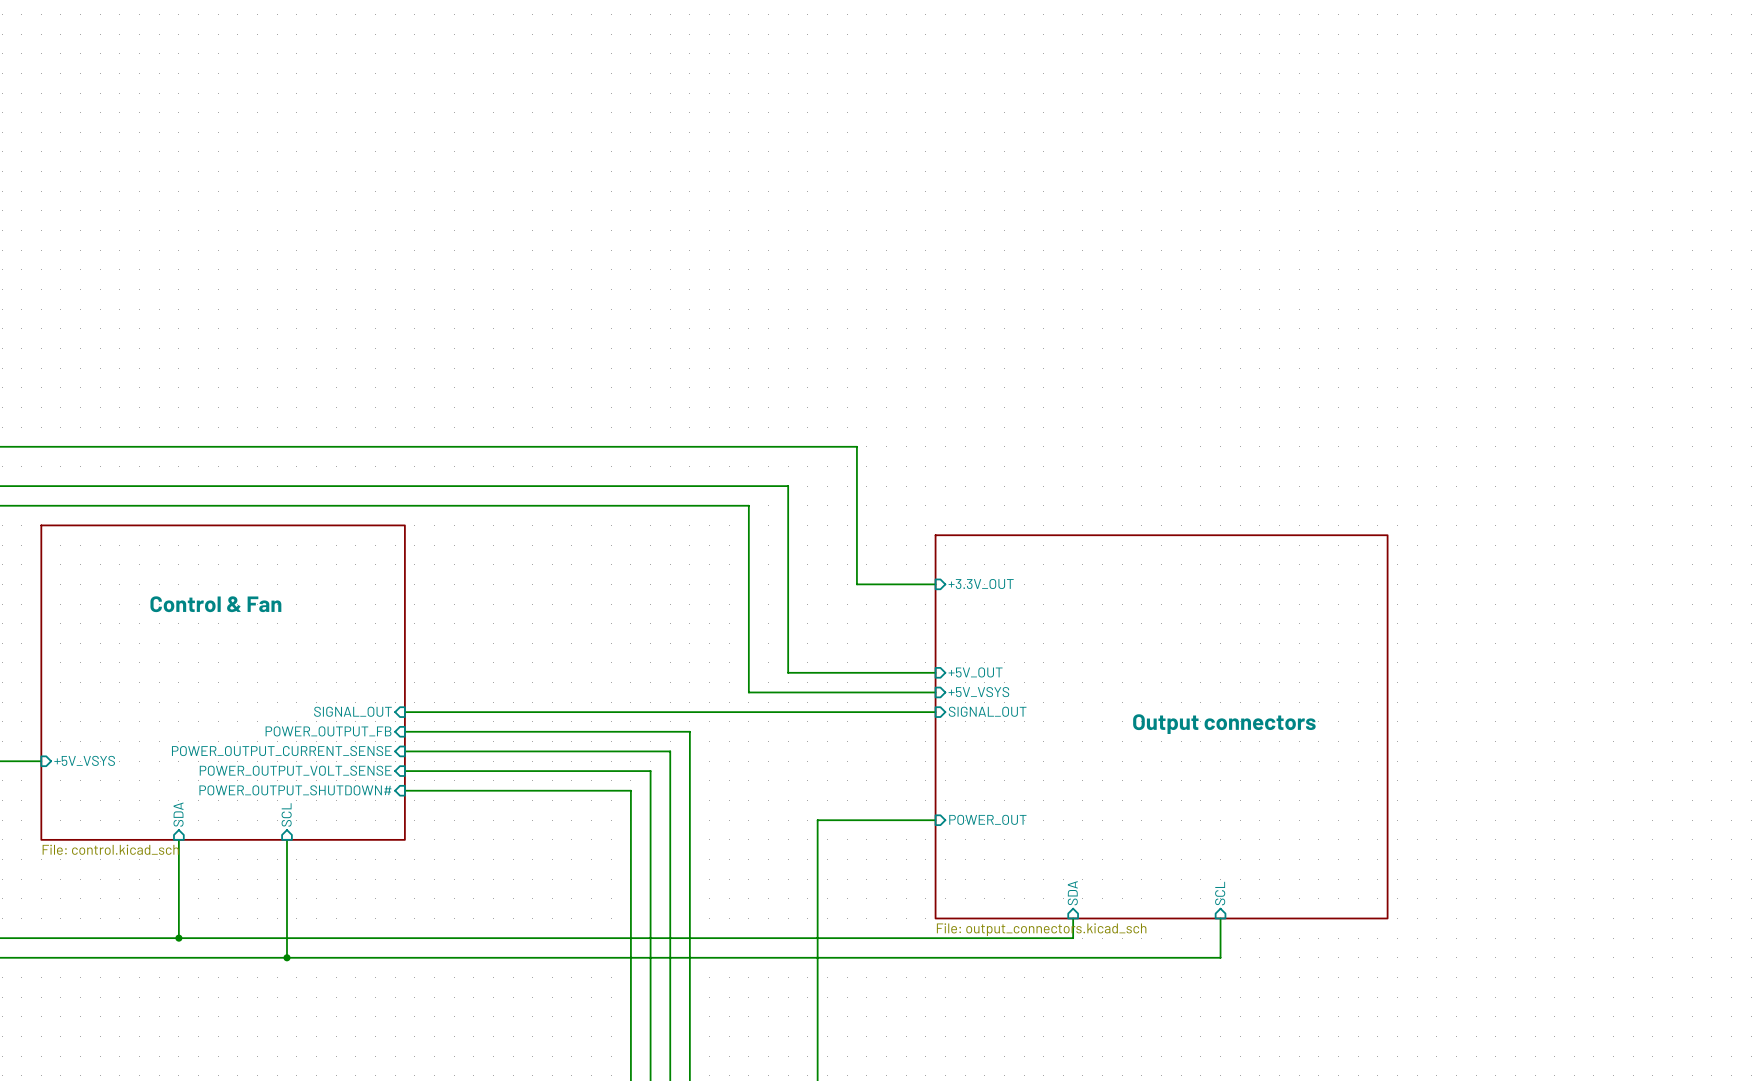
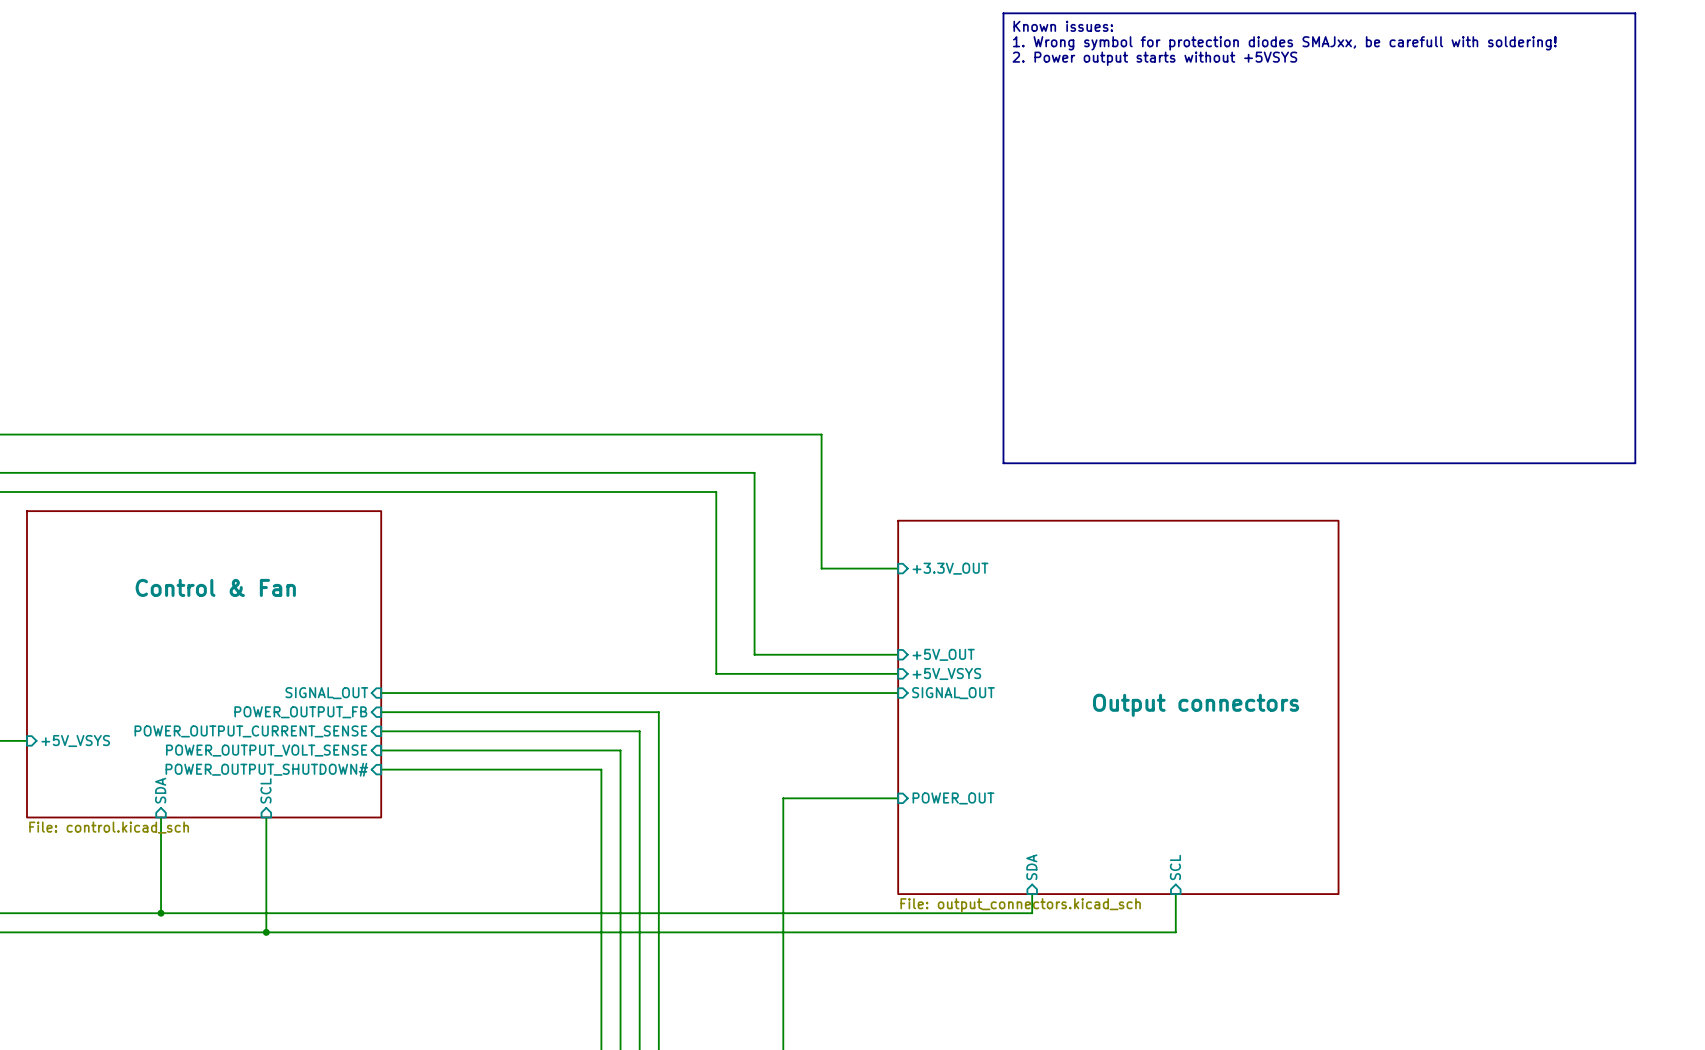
line: none -> (1003, 13) (1635, 13) (1635, 463) (1003, 463) (1003, 13)
text: none -> Known issues: (1063, 26)
text: none -> 1. Wrong symbol for protection diodes SMAJxx, be carefull with soldering! (1284, 43)
text: none -> 2. Power output starts without +5VSYS (1154, 58)

